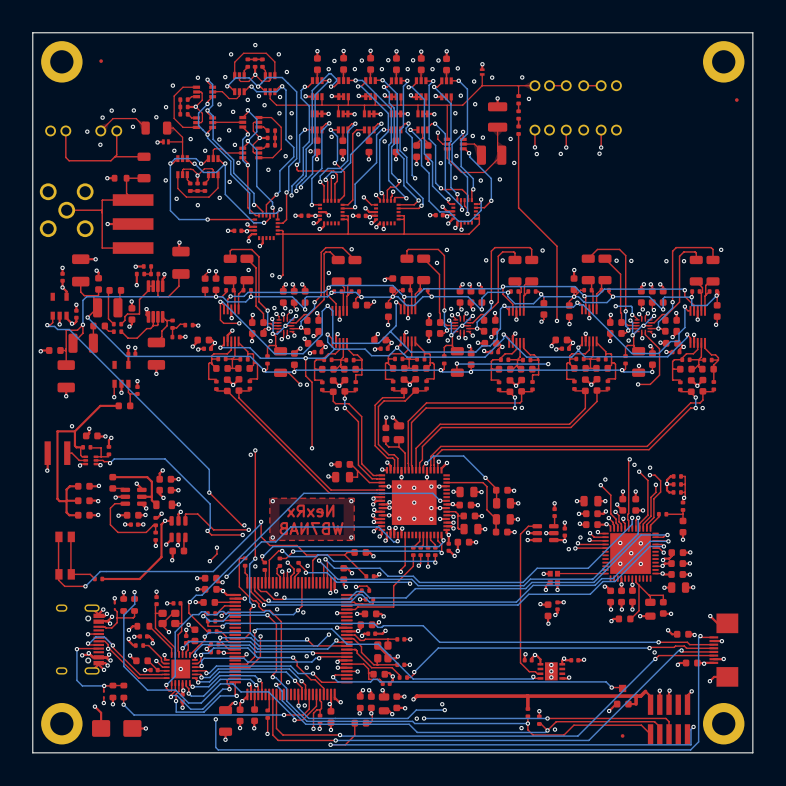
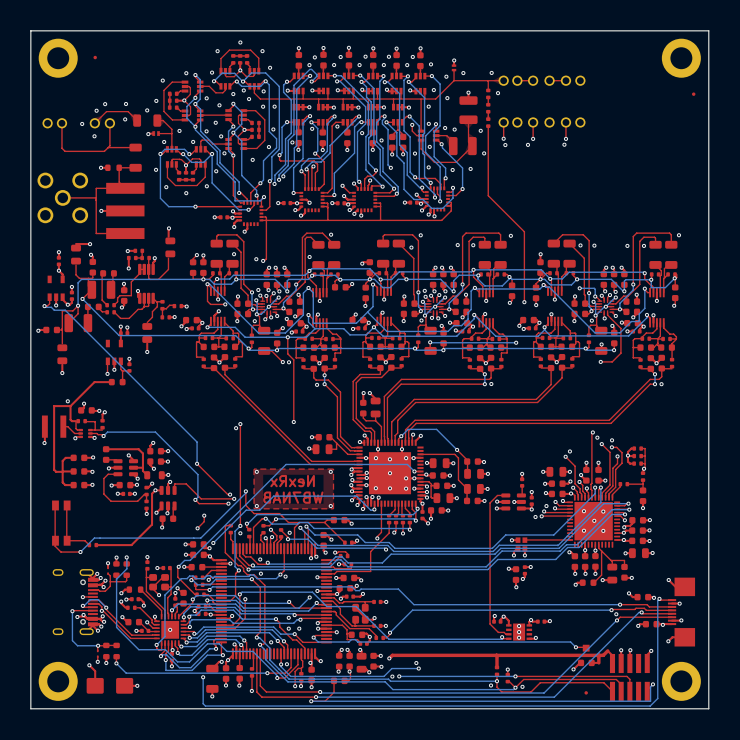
part footprint: [172, 246, 190, 279] -> [165, 237, 176, 258]
part footprint: [72, 254, 90, 287] -> [71, 244, 81, 265]
part footprint: [147, 337, 166, 370] -> [142, 323, 153, 343]
part footprint: [57, 360, 75, 393] -> [57, 344, 68, 365]

